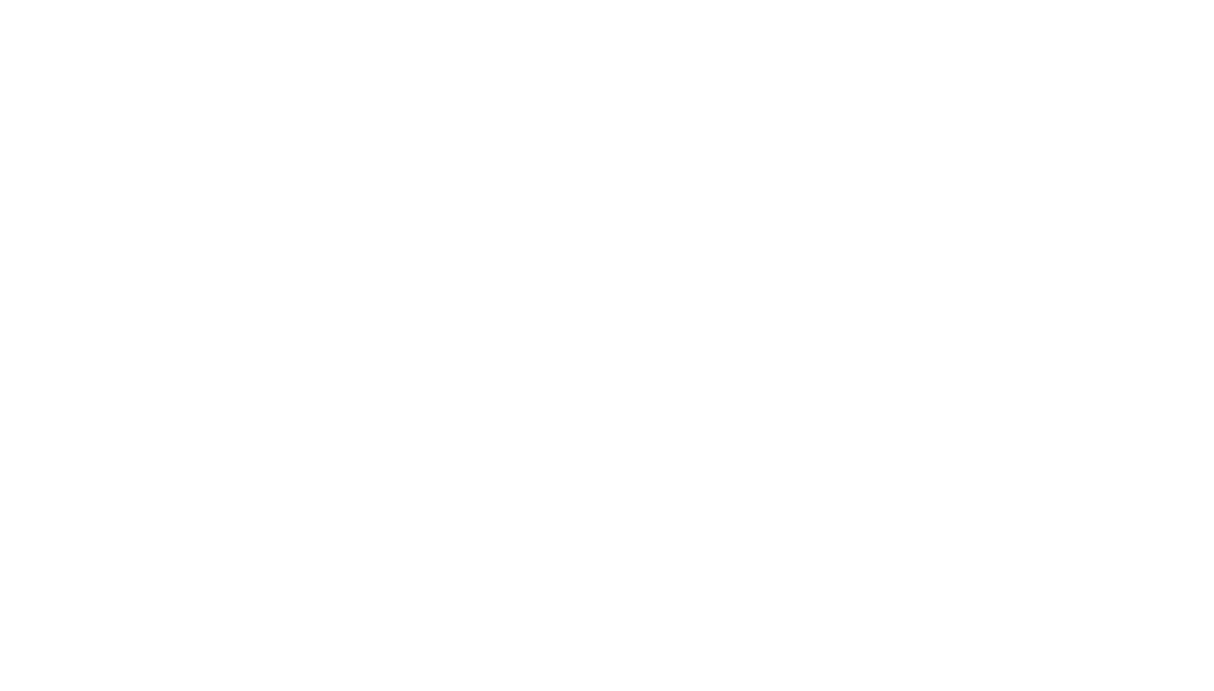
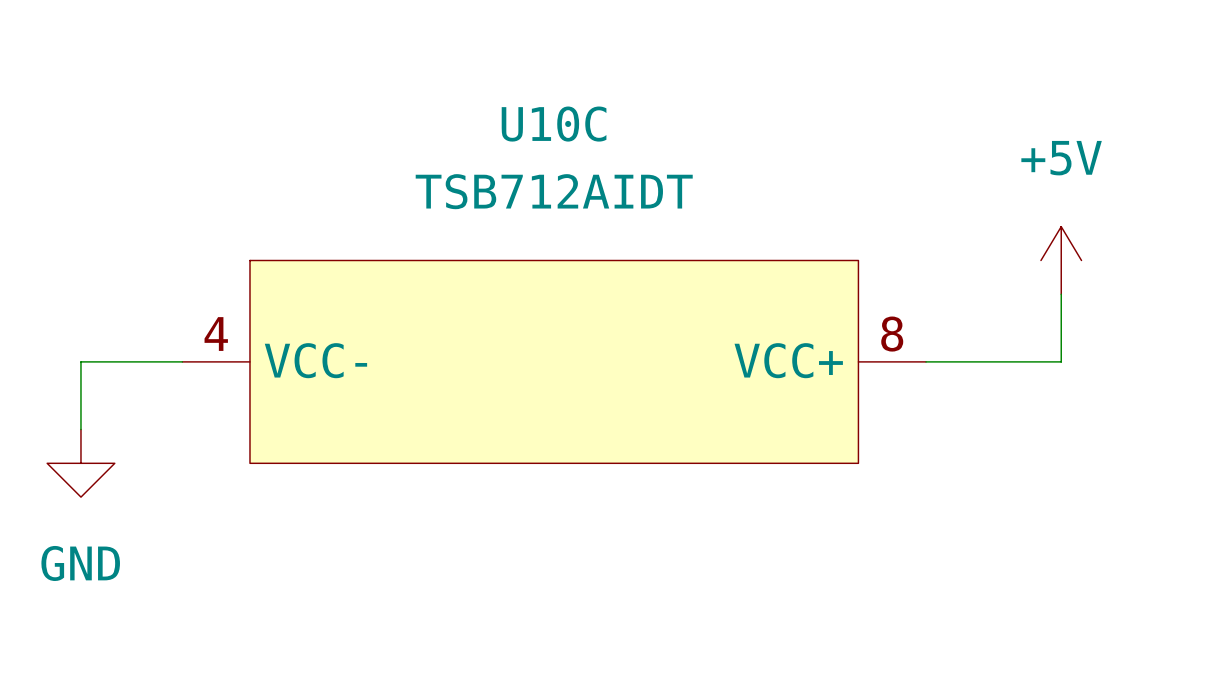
power symbol: none -> +5V (1061, 260)
wire: none -> (1061, 294) (1061, 361) (926, 361)
wire: none -> (182, 361) (80, 361) (80, 429)
U10C: none -> TSB712AIDT (554, 361)
power symbol: none -> GND (80, 463)

